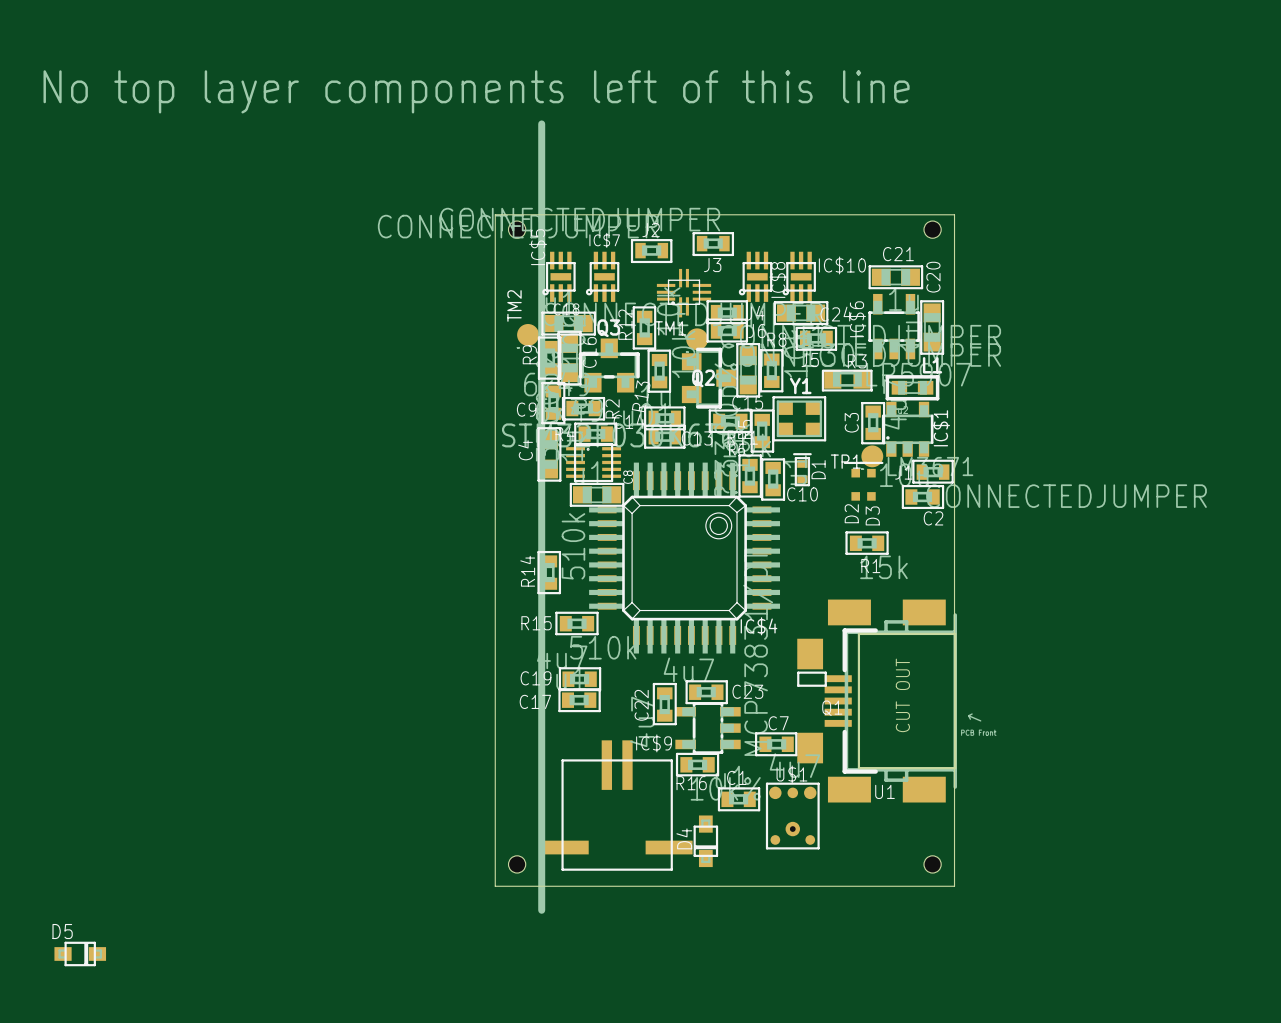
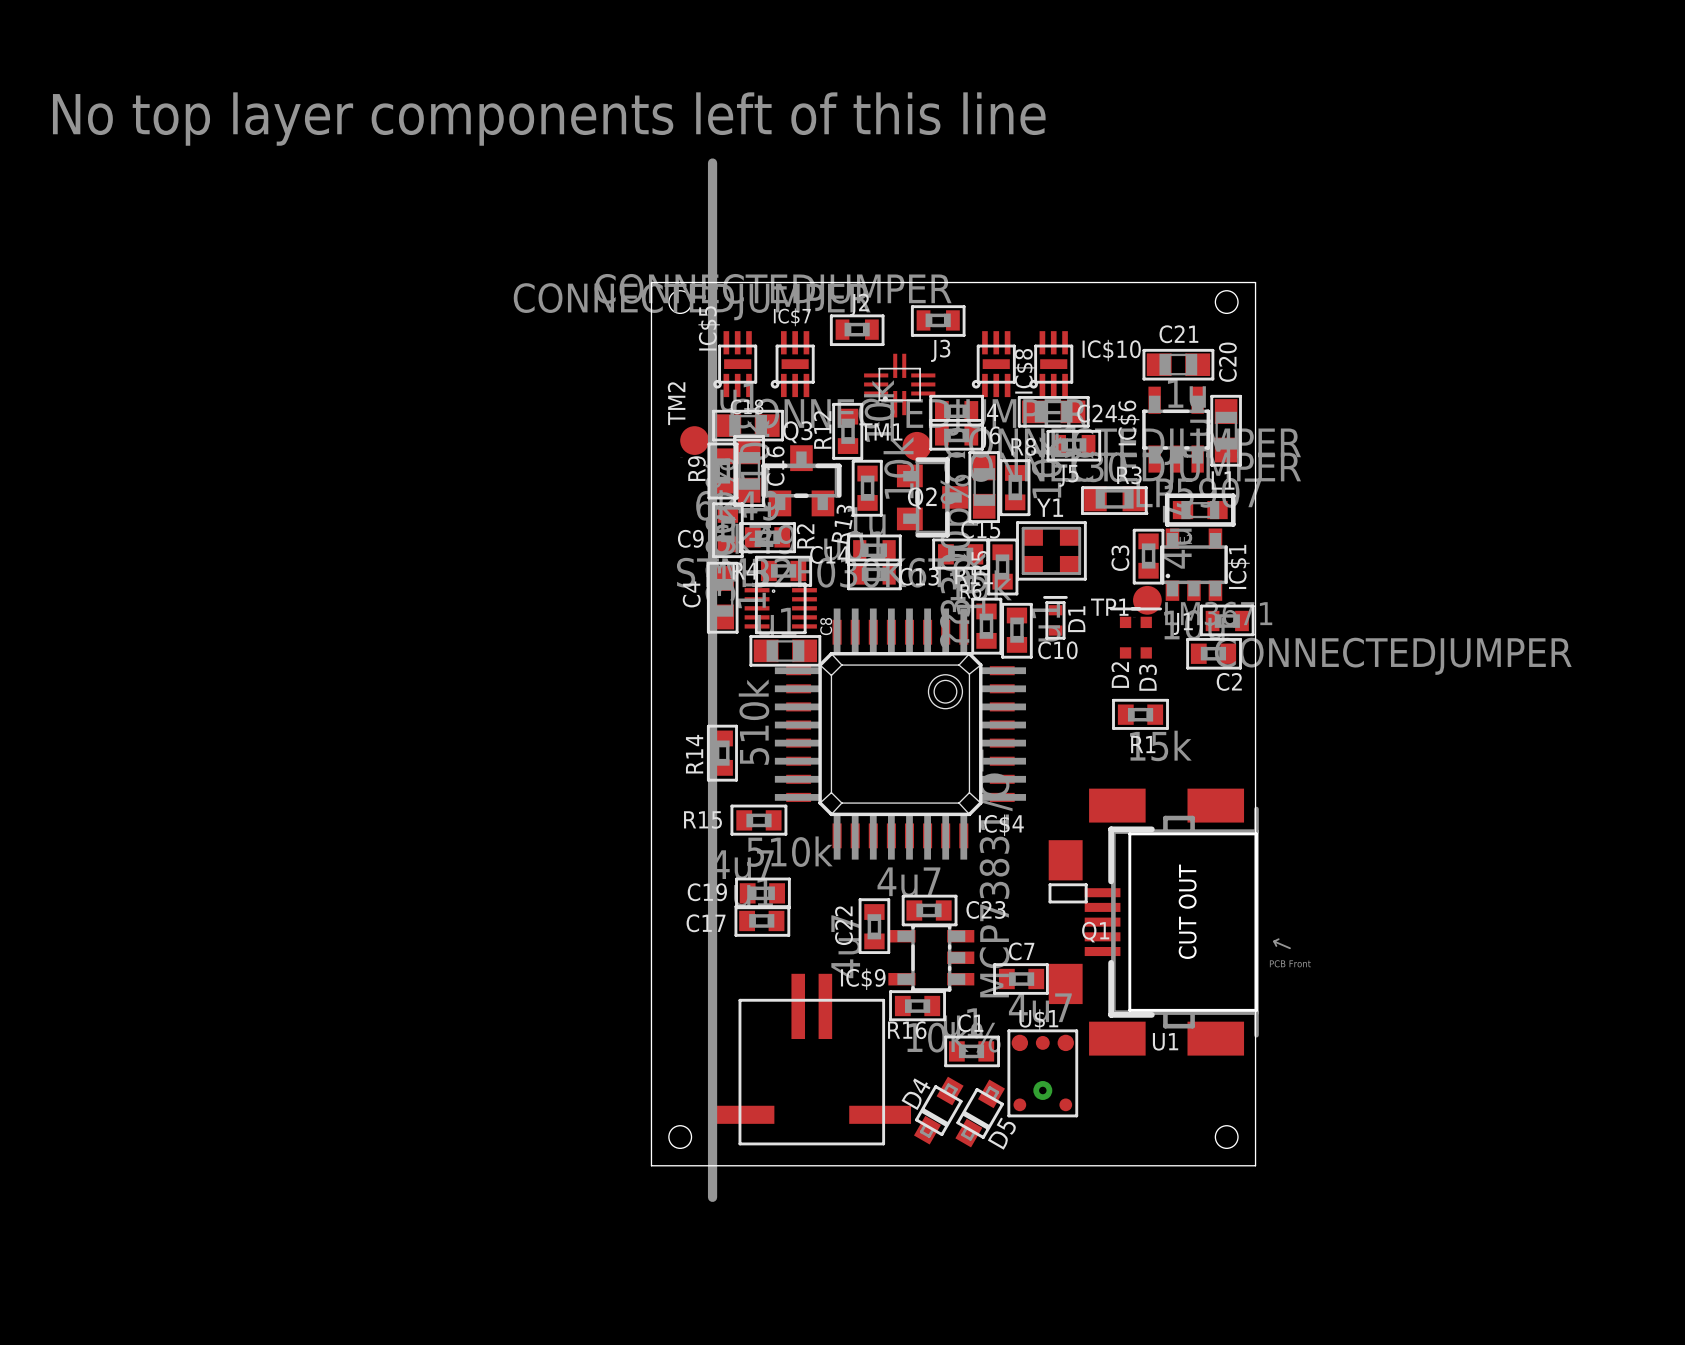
D4 rotation: 0° (705, 841) -> 30° clockwise (938, 1110)
D5 rotation: 0° (80, 953) -> 120° clockwise (980, 1113)
D5 position: (80, 953) -> (980, 1113)

